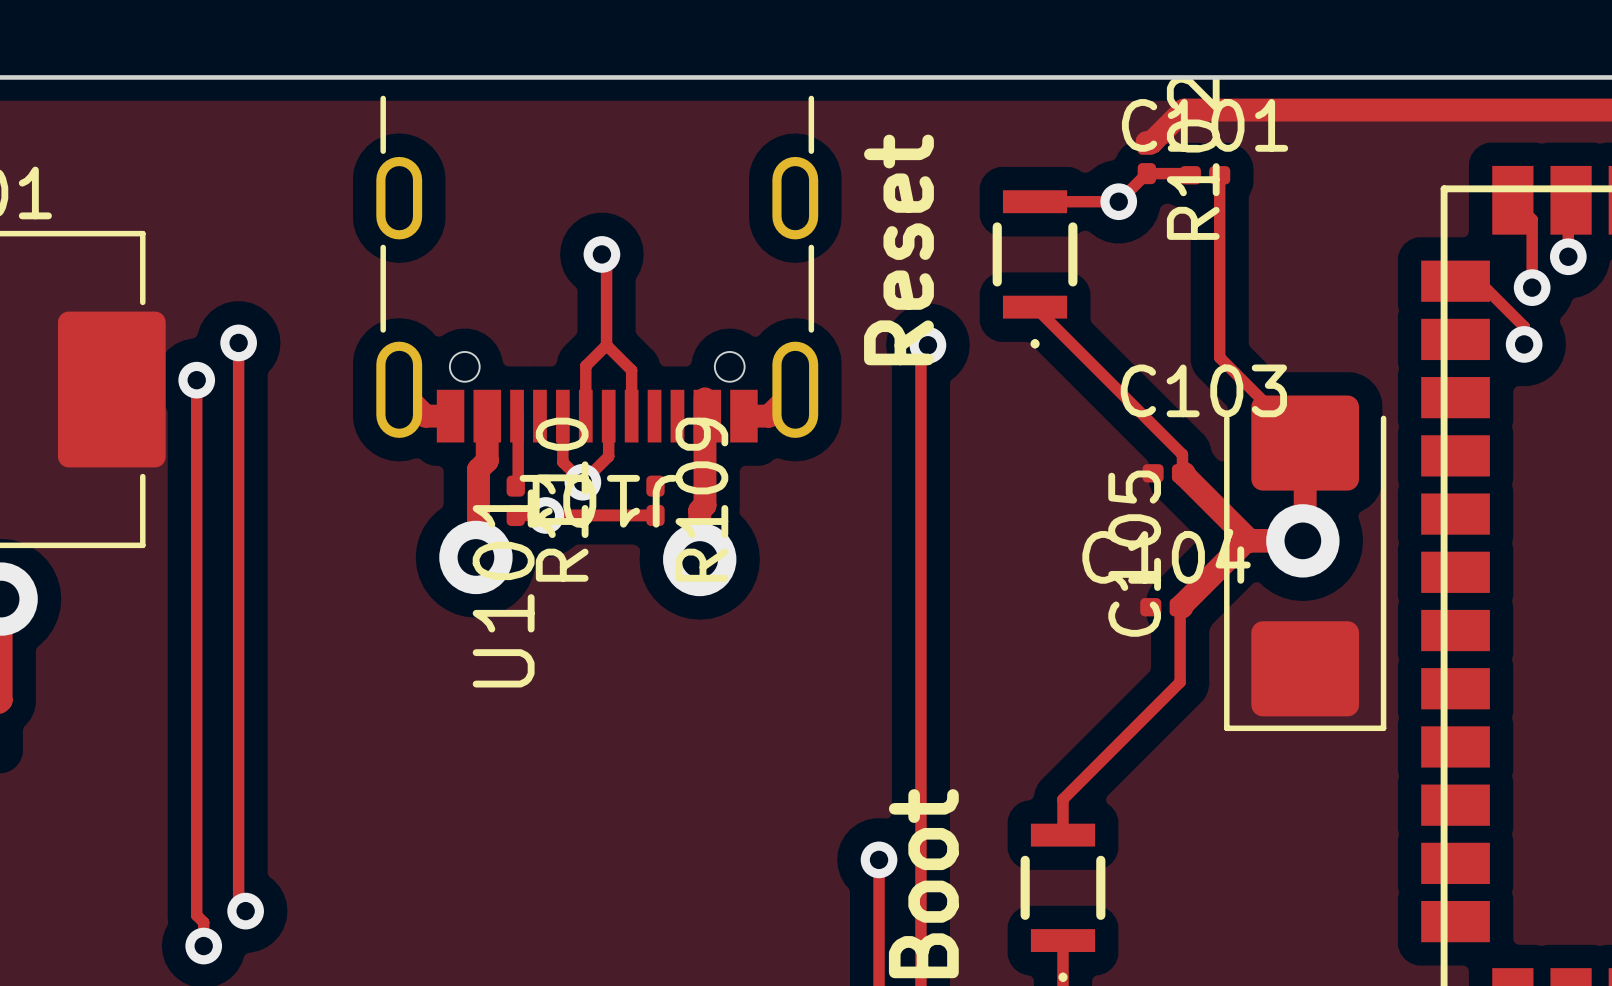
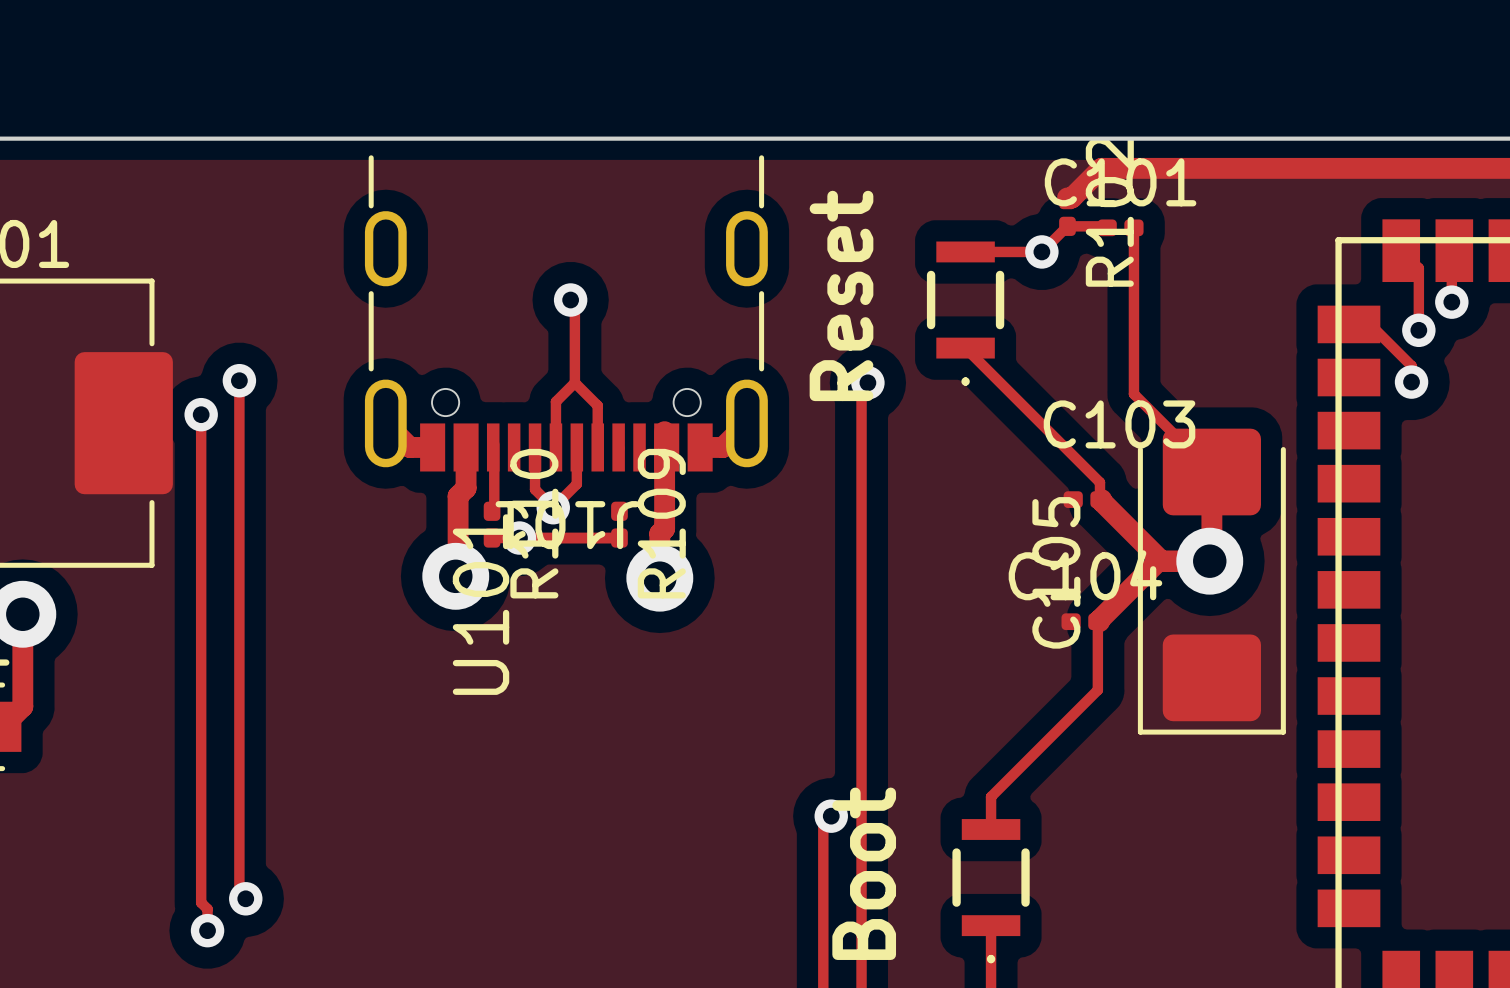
track: none -> (831, 816) (823, 824) (823, 852)
via position: (879, 859) -> (831, 816)

